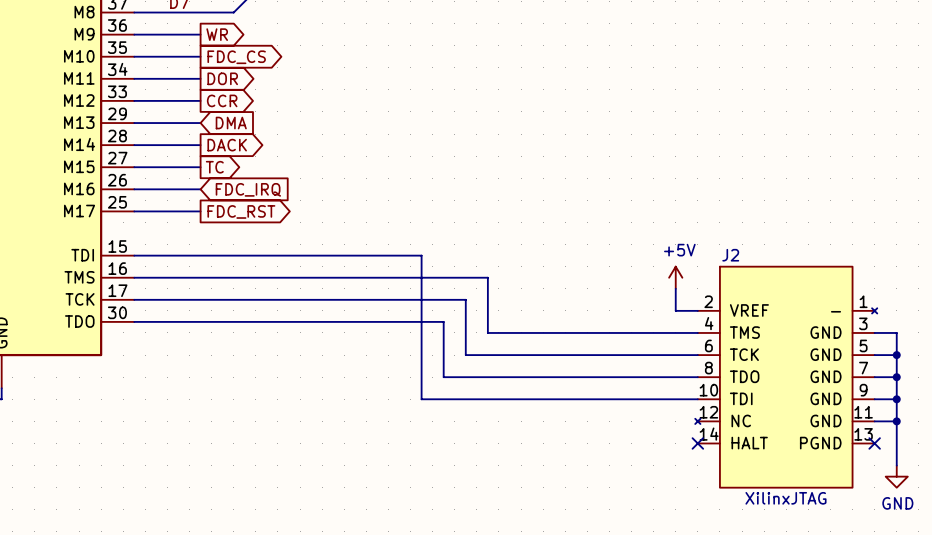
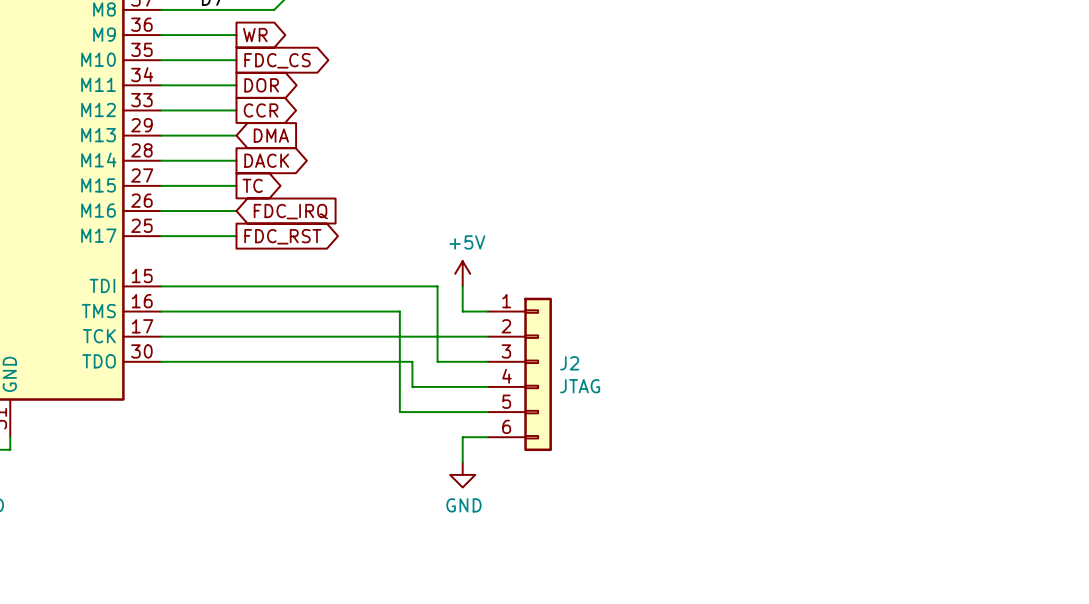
power symbol: none -> +5V (462, 273)
wire: (377, 255) (421, 255) (421, 399) (697, 399) -> (437, 286) (437, 361)
J2 name position: J2 (730, 255) -> J2 (569, 363)
J2 symbol: [695, 266, 878, 488] -> [487, 297, 552, 452]
wire: (344, 277) (399, 277) -> (462, 286) (462, 311)
wire: none -> (399, 311) (399, 412) (487, 412)
wire: (421, 277) (487, 277) (487, 332) (697, 332) -> none
power symbol: +5V (675, 277) -> none
wire: (675, 288) (675, 310) (697, 310) -> none
wire: (421, 299) (465, 299) (465, 355) (697, 355) -> none
wire: (355, 321) (377, 321) -> (412, 361) (412, 386) (487, 386)
wire: (421, 321) (443, 321) (443, 377) (697, 377) -> none
wire: (874, 332) (896, 332) (896, 465) -> none
wire: (874, 355) (896, 355) -> none
junction: (896, 355) -> none
wire: (874, 377) (896, 377) -> none
junction: (896, 377) -> none
wire: none -> (487, 437) (462, 437) (462, 462)
wire: (874, 399) (896, 399) -> none
junction: (896, 399) -> none
power symbol: none -> GND (462, 474)
wire: (874, 421) (896, 421) -> none
junction: (896, 421) -> none
no-connect mark: (697, 443) -> none
no-connect mark: (874, 443) -> none
power symbol: GND (896, 476) -> none
J2 value: XilinxJTAG (785, 498) -> JTAG (580, 386)

